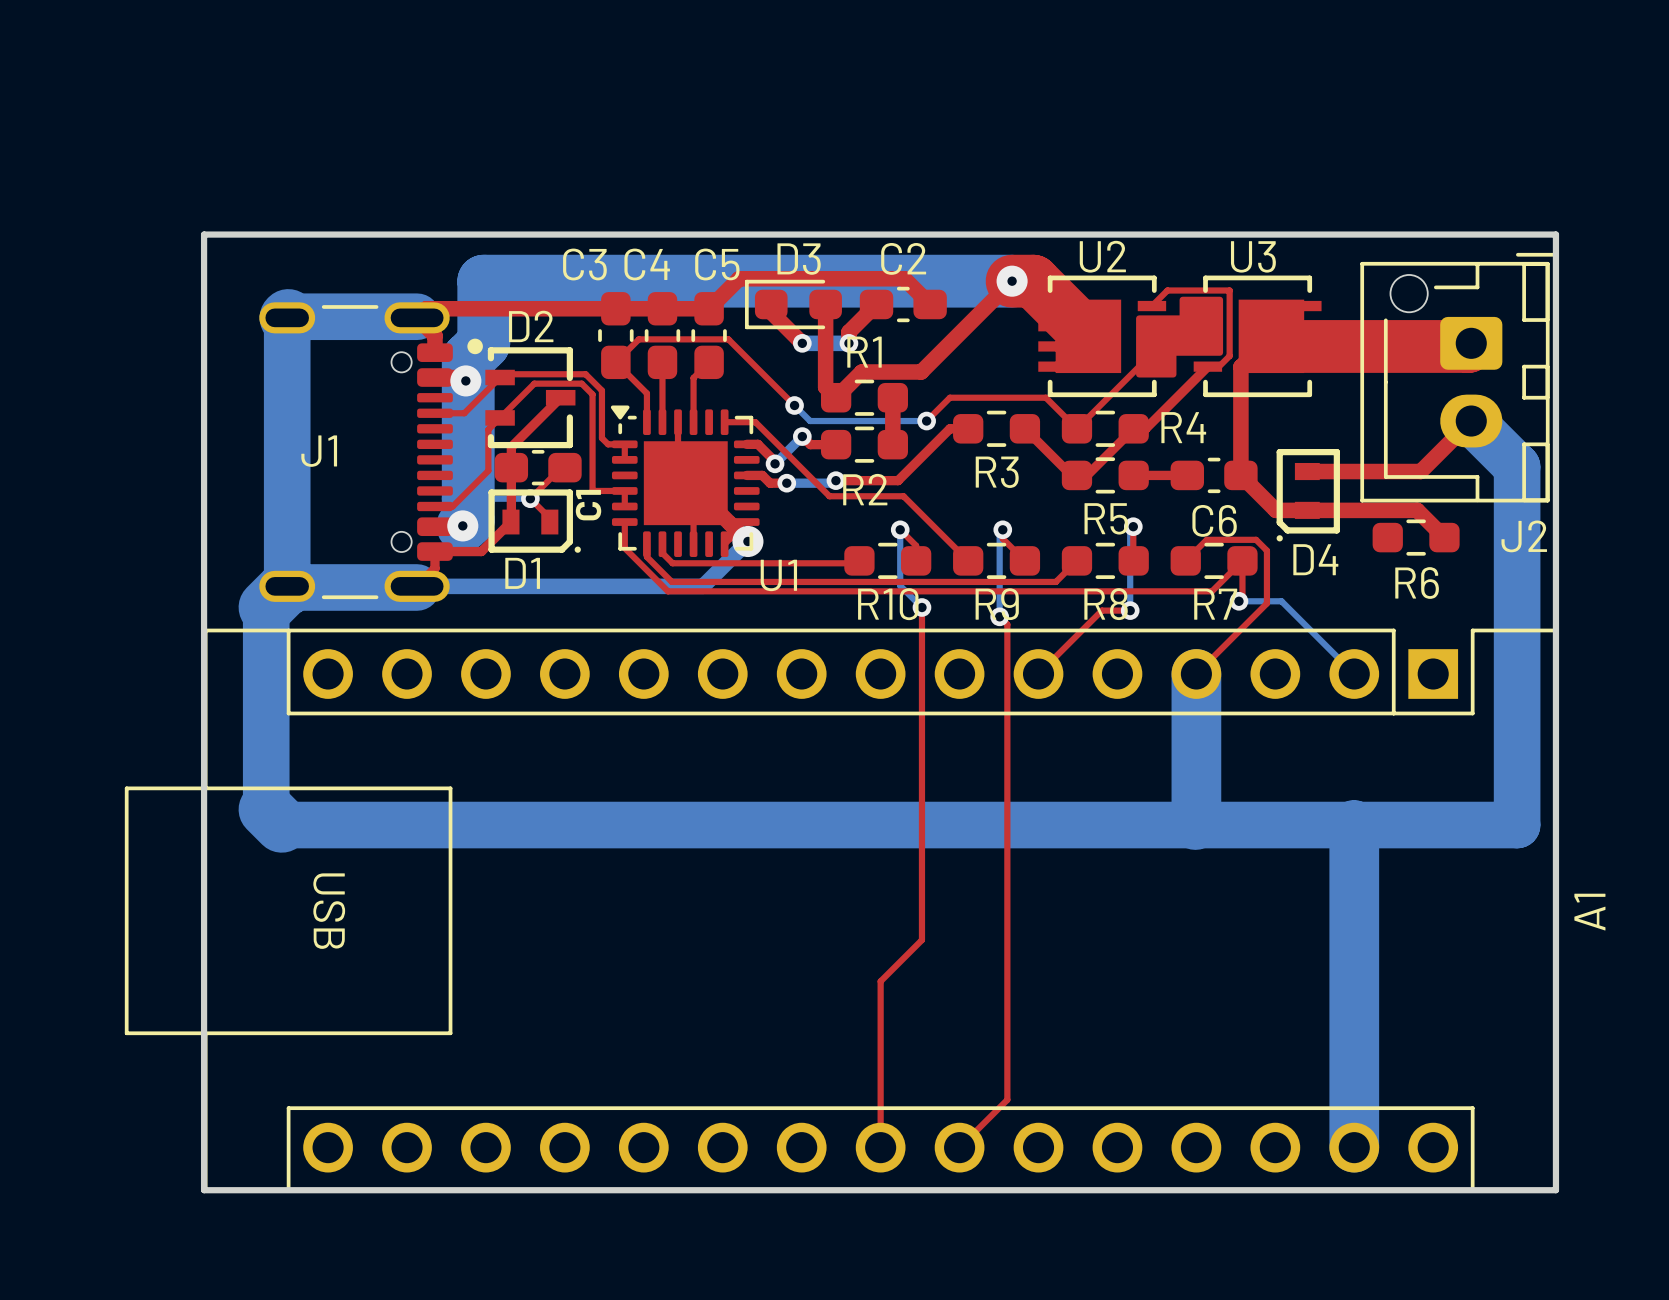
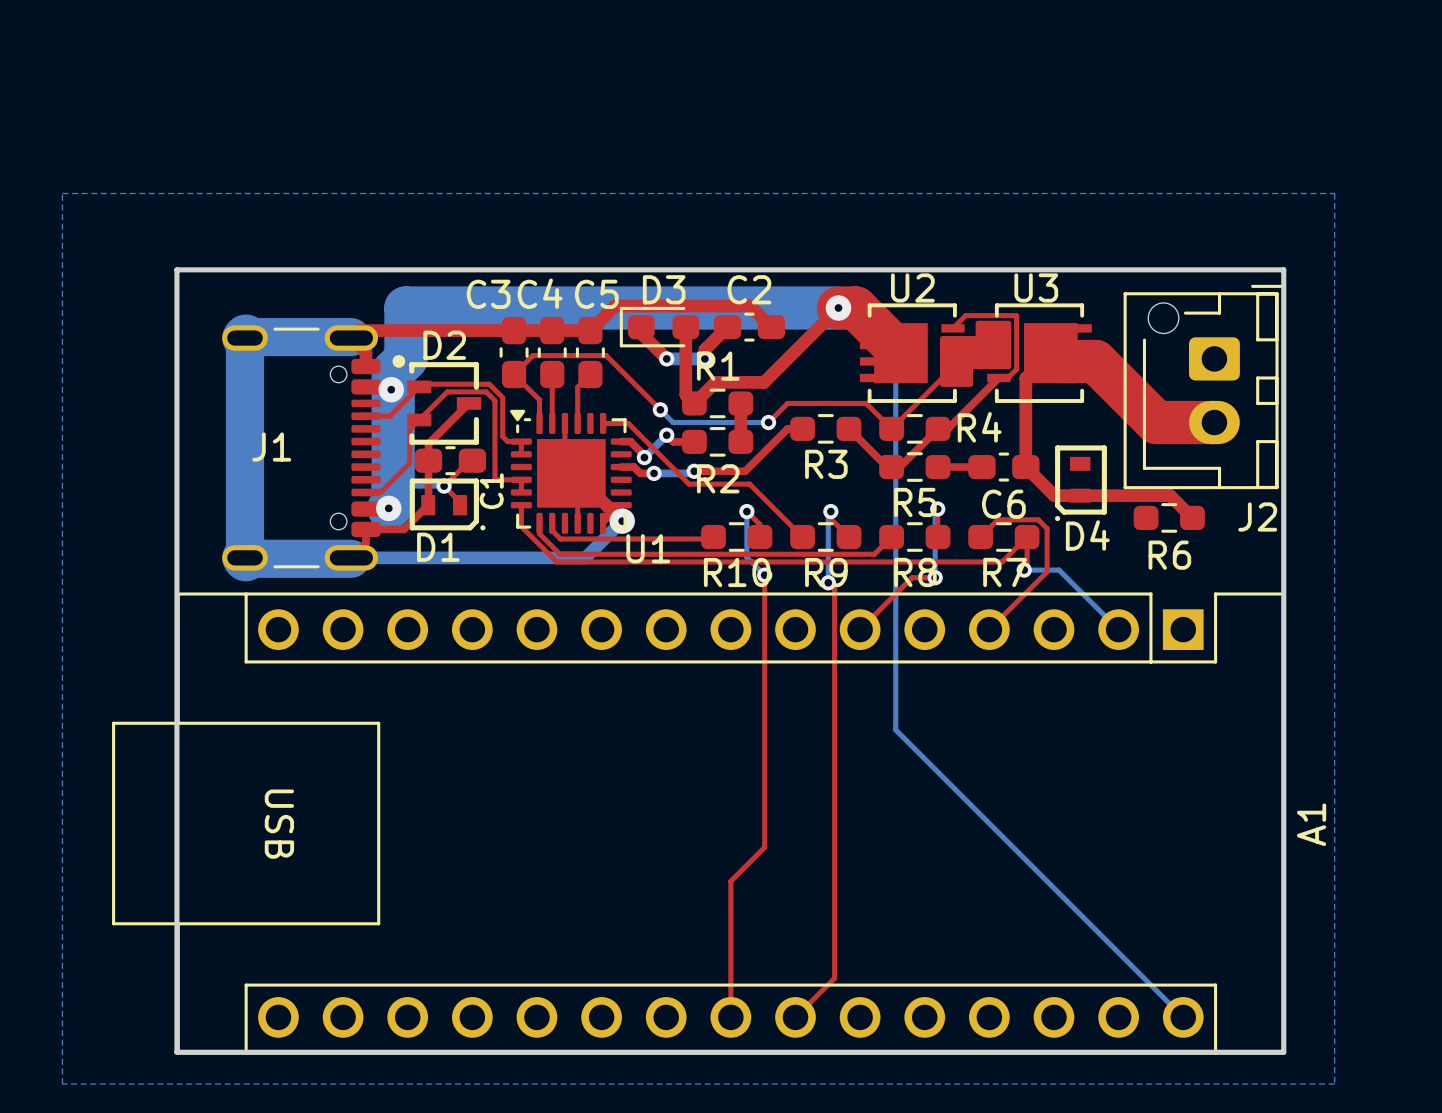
bottom zone outline: none -> (62, 193) (1334, 193) (1334, 1084) (62, 1084) (62, 193)
bottom track: none -> (838, 308) (895, 365) (895, 729) (1183, 1017)
top track: (1471, 343) (1468, 346) (1326, 346) -> (1214, 422) (1156, 422) (1095, 361)
top track: (1471, 421) (1420, 471) (1307, 471) -> none
bottom track: (1471, 421) (1517, 466) (1517, 825) (281, 825) (266, 809) (266, 607) (287, 586) -> none
bottom track: (1196, 674) (1195, 825) -> none
bottom track: (1354, 825) (1354, 1147) -> none

